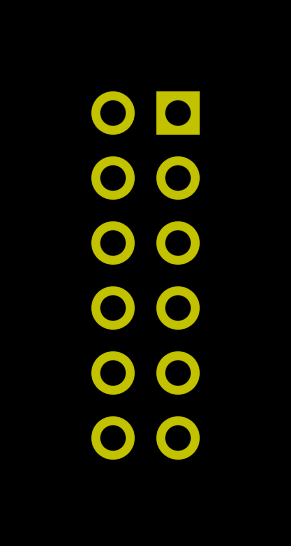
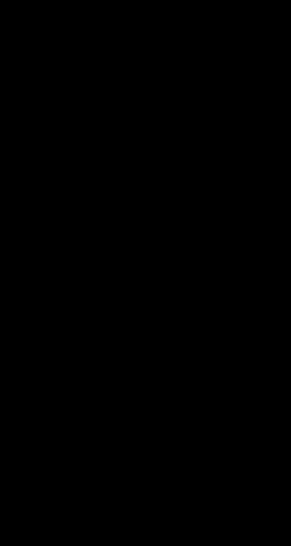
part: (145, 275) -> none

